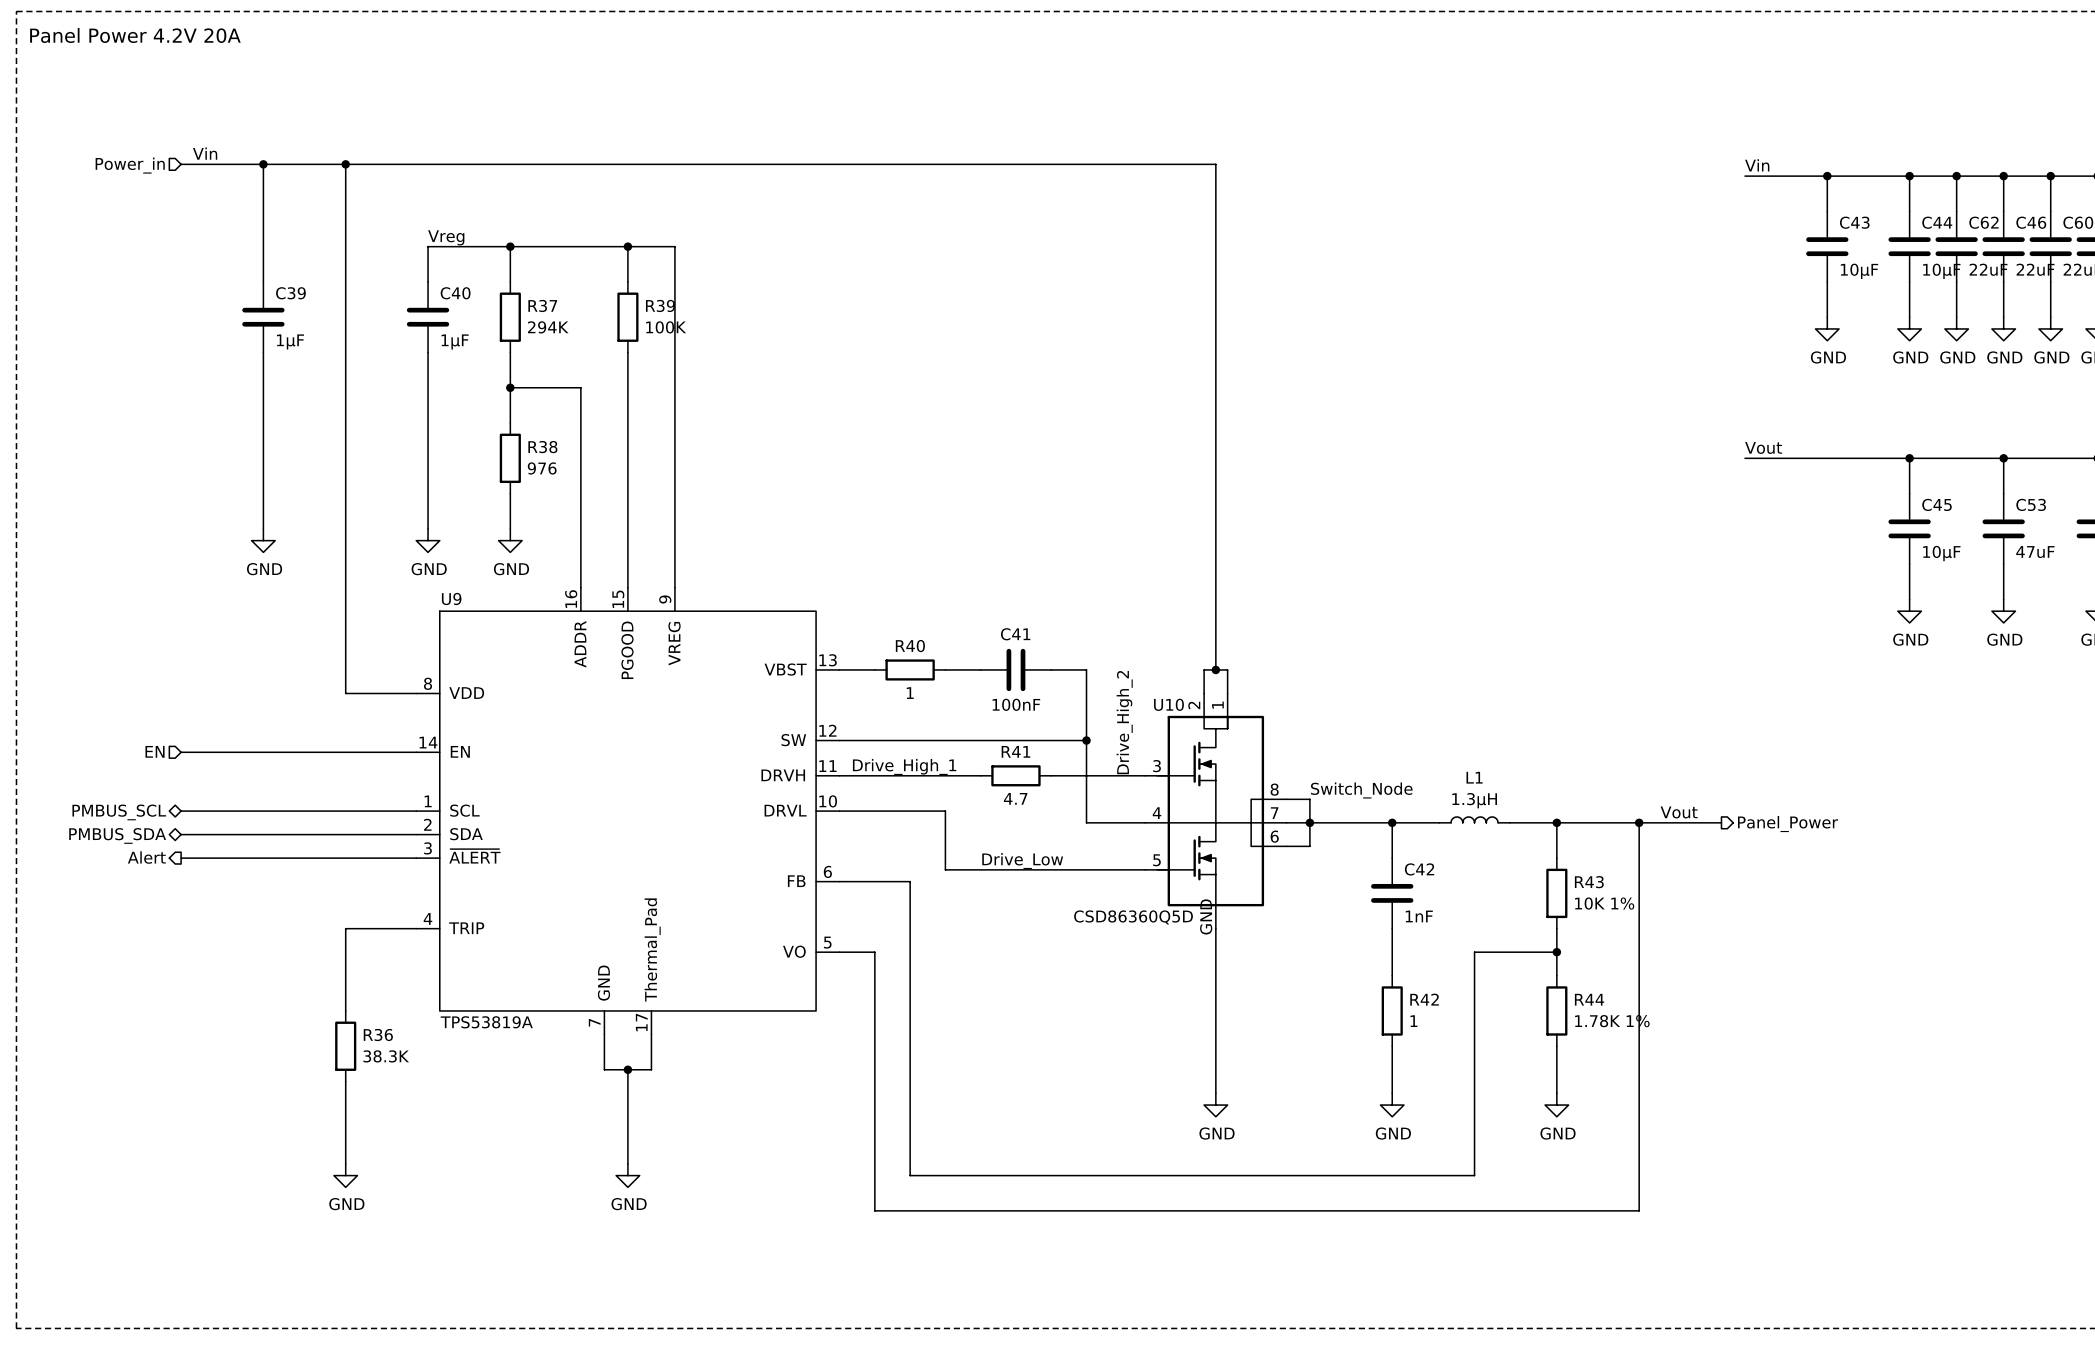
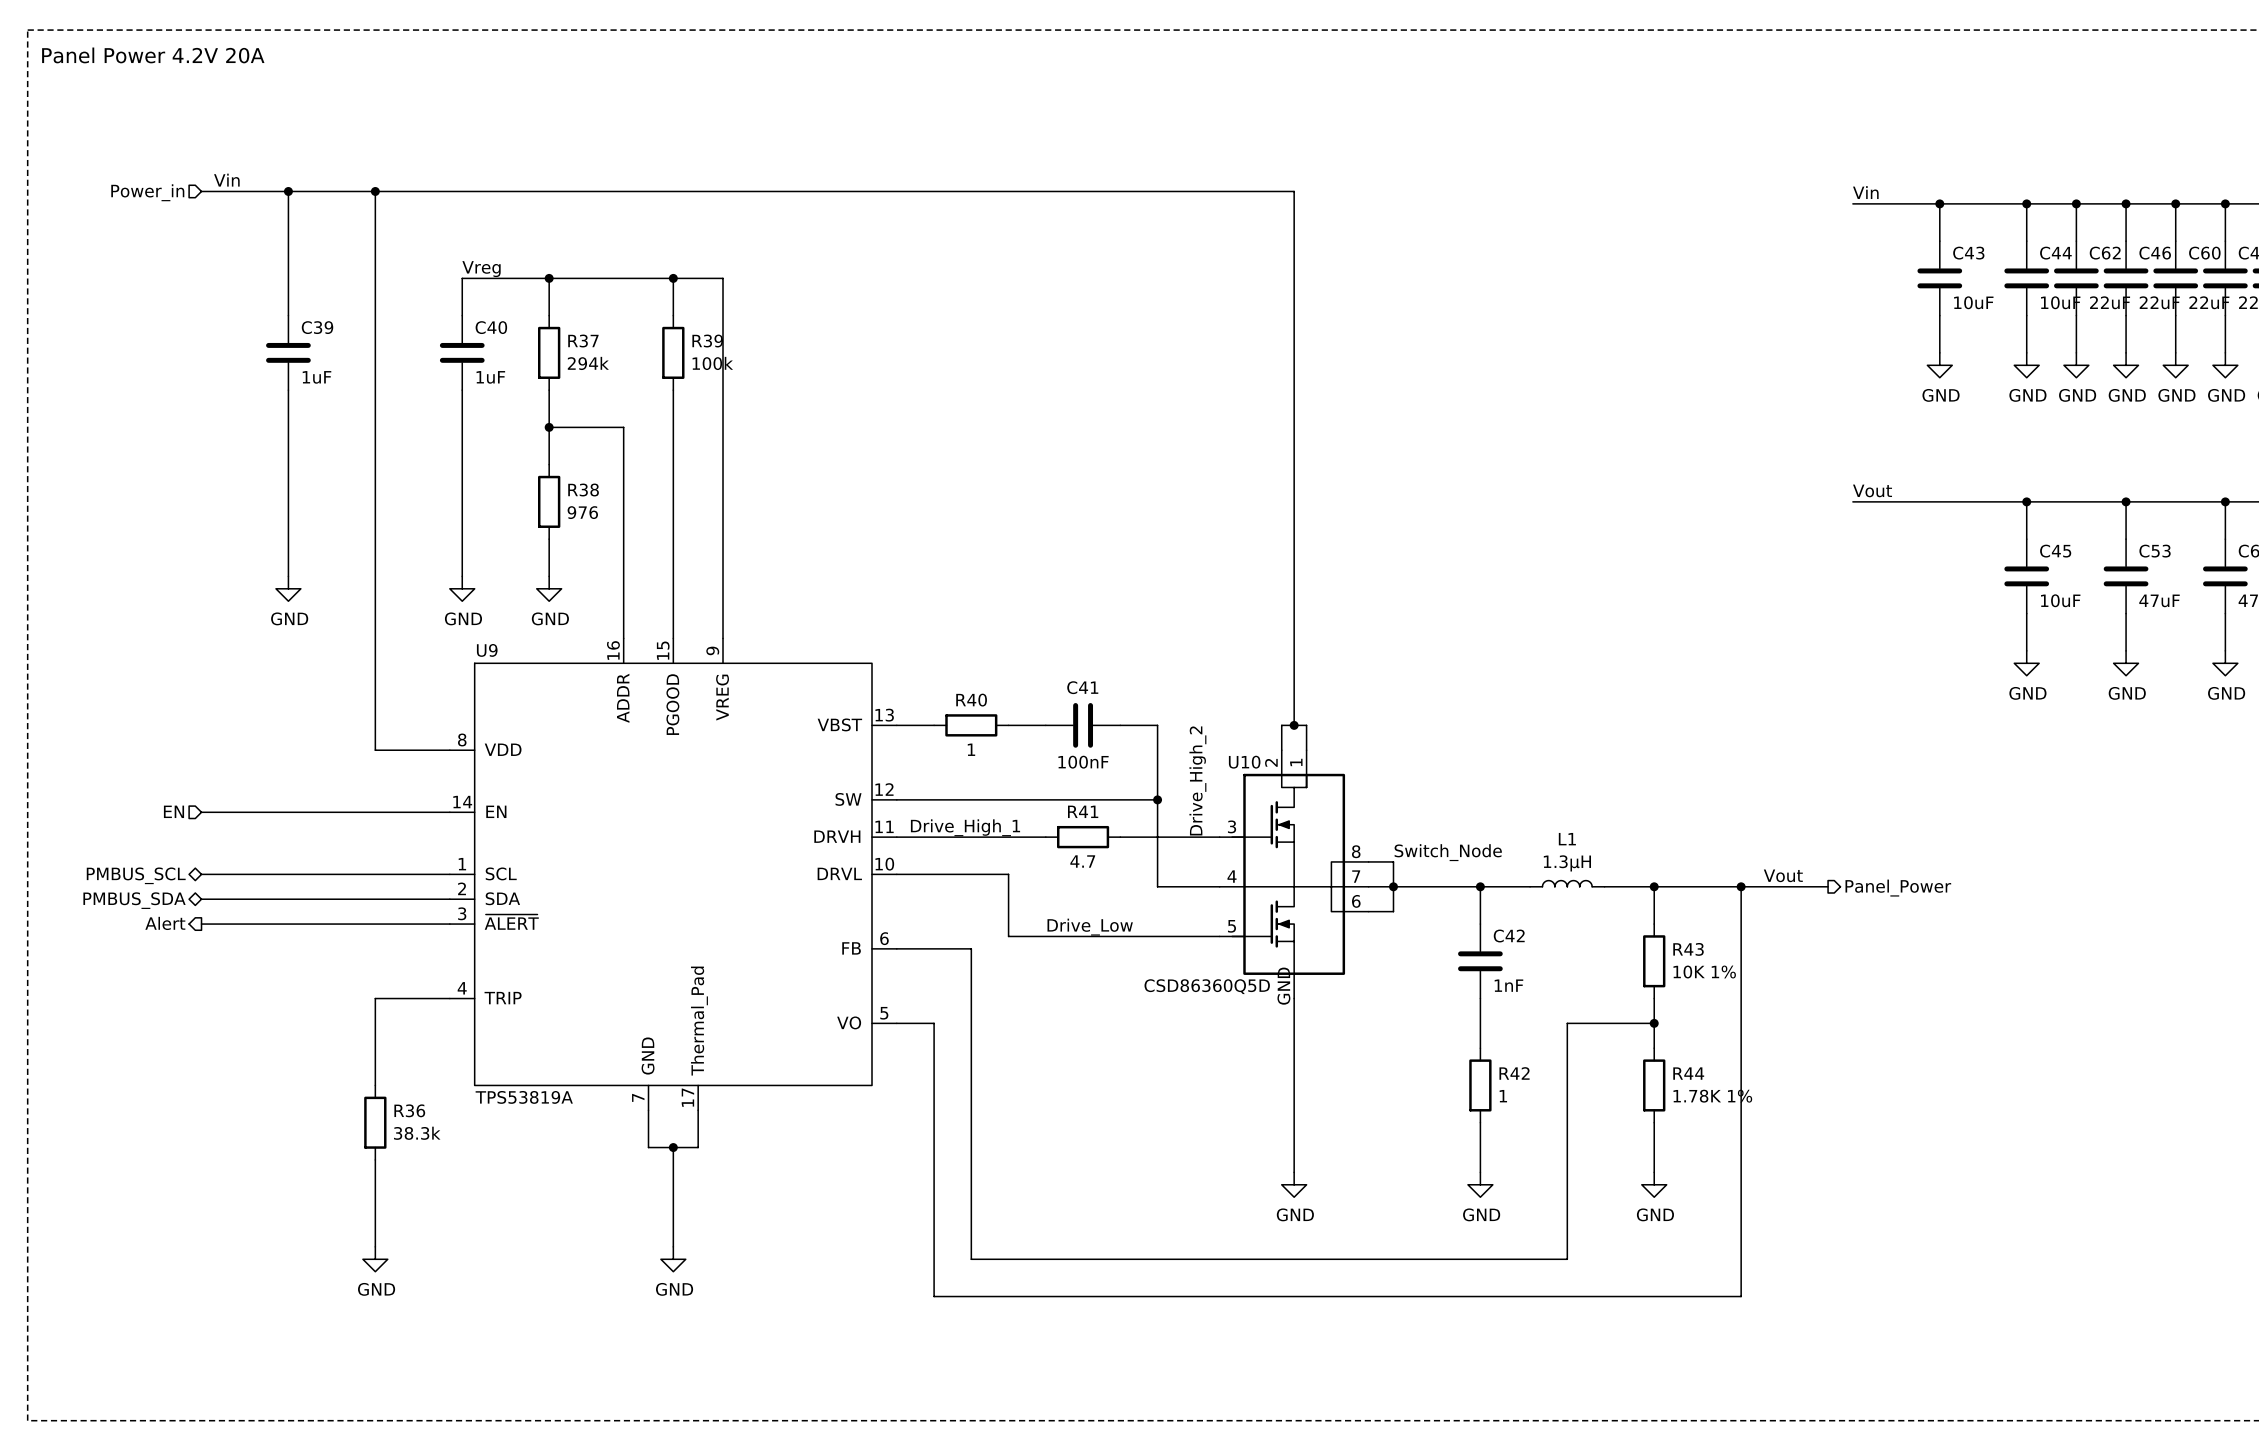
C43 value: 10µF (1859, 271) -> 10uF (1973, 302)
C44 value: 10µF (1941, 271) -> 10uF (2060, 302)
R37 value: 294K (548, 327) -> 294k (588, 363)
R39 value: 100K (666, 327) -> 100k (712, 363)
C39 value: 1µF (290, 341) -> 1uF (317, 377)
C40 value: 1µF (455, 341) -> 1uF (490, 377)
C45 value: 10µF (1941, 553) -> 10uF (2060, 600)
R36 value: 38.3K (386, 1056) -> 38.3k (417, 1133)

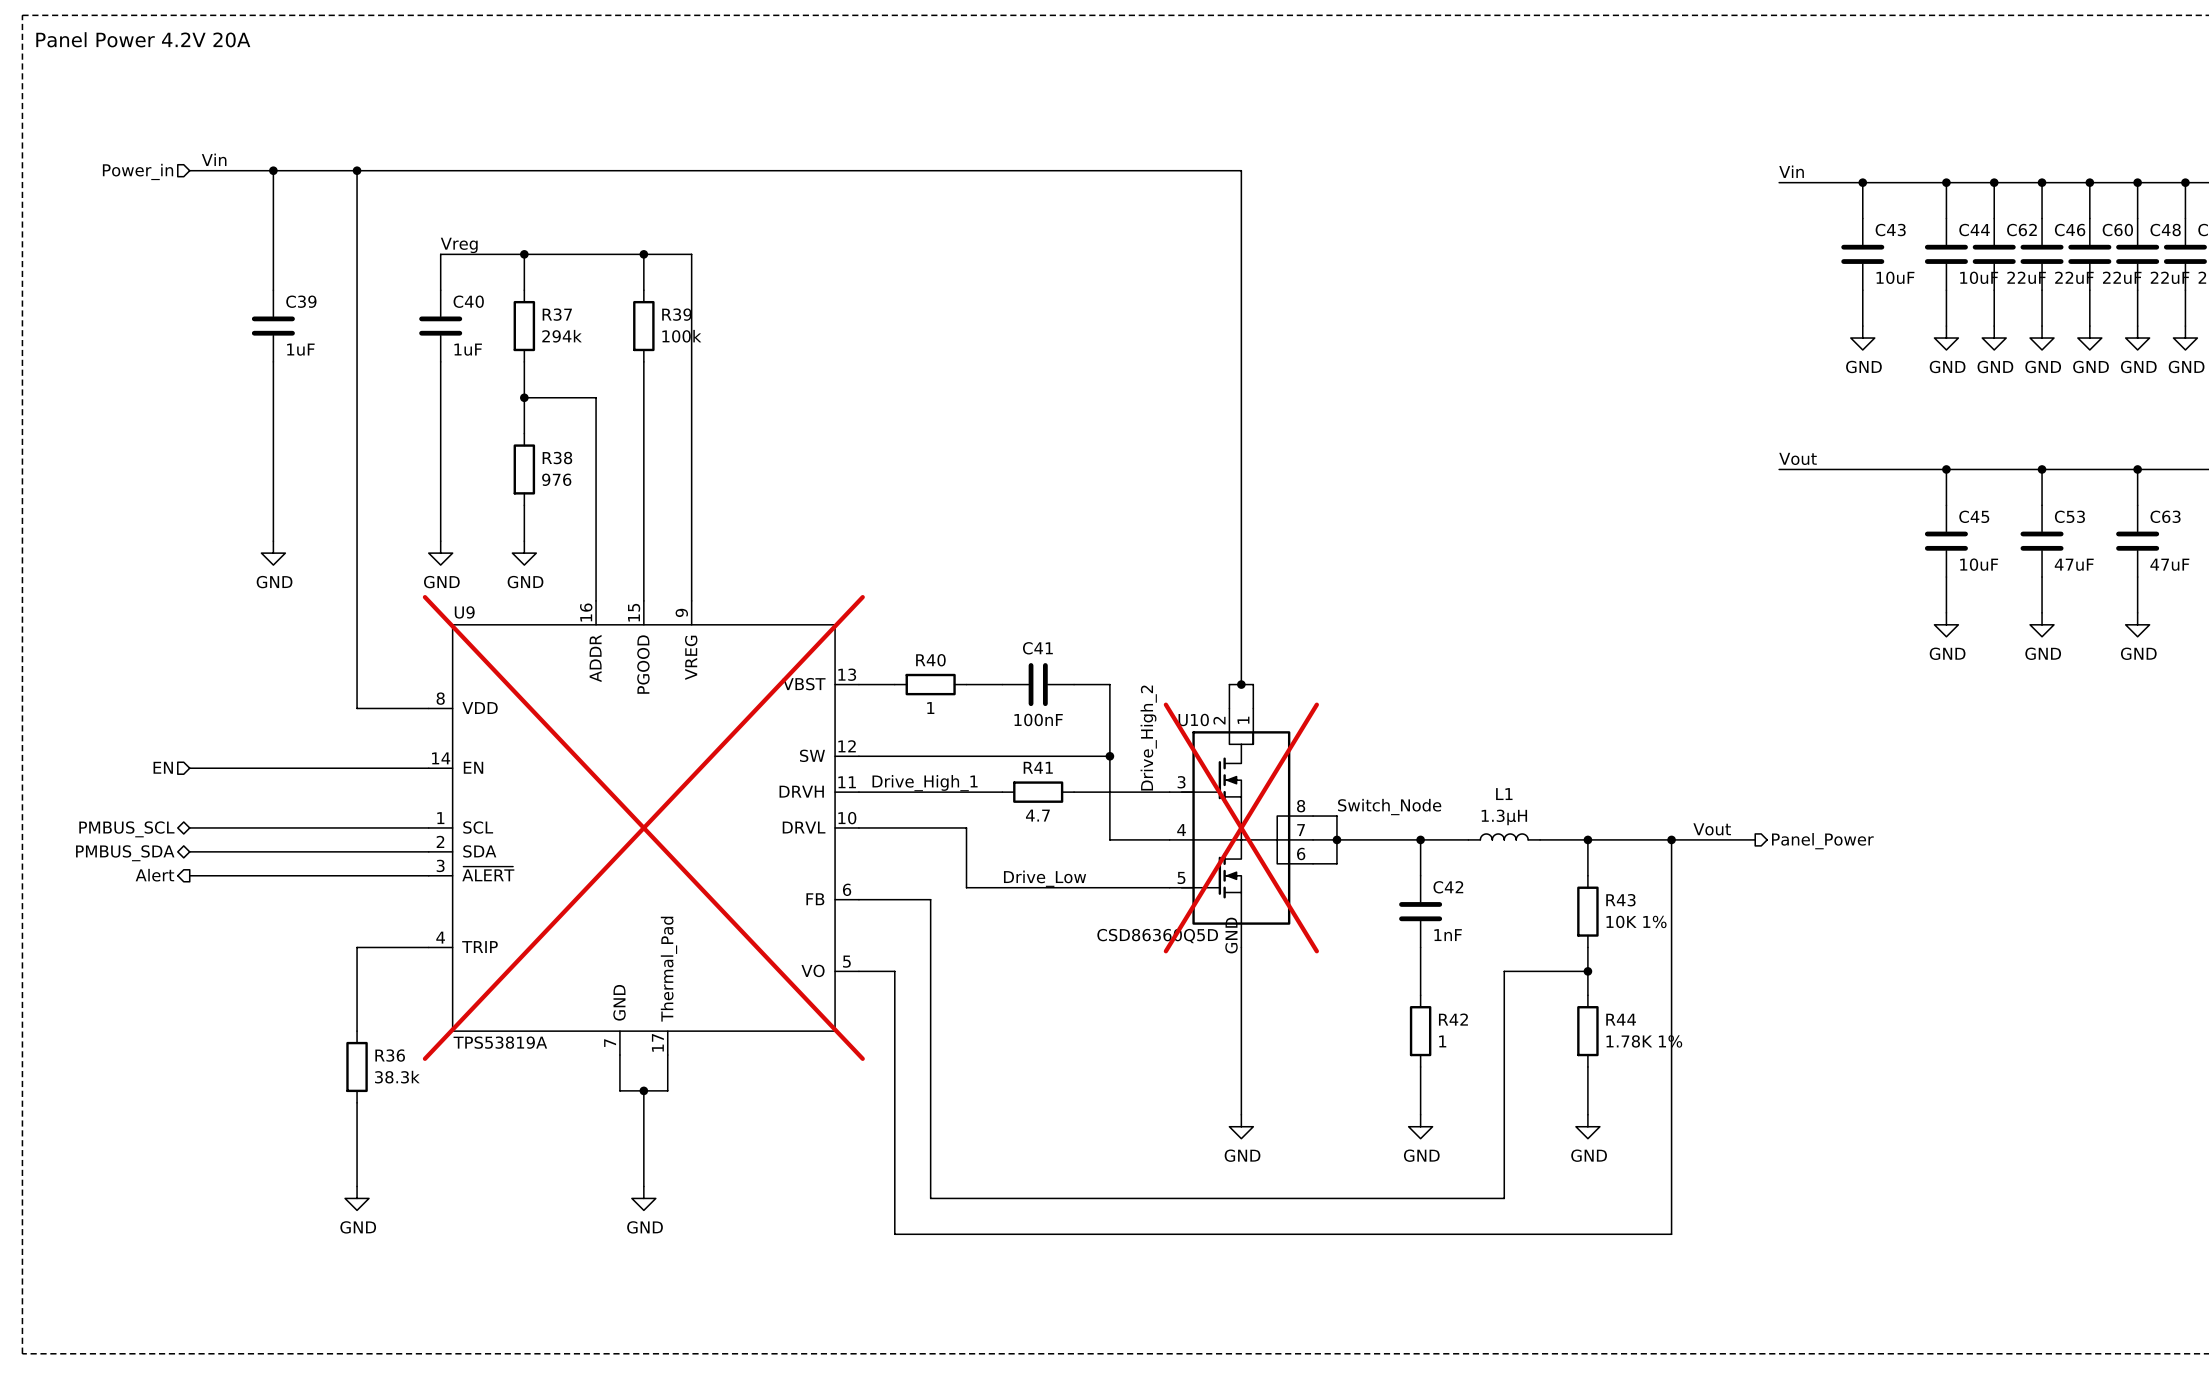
U9 do-not-place cross: none -> (643, 827)
U10 do-not-place cross: none -> (1241, 827)

